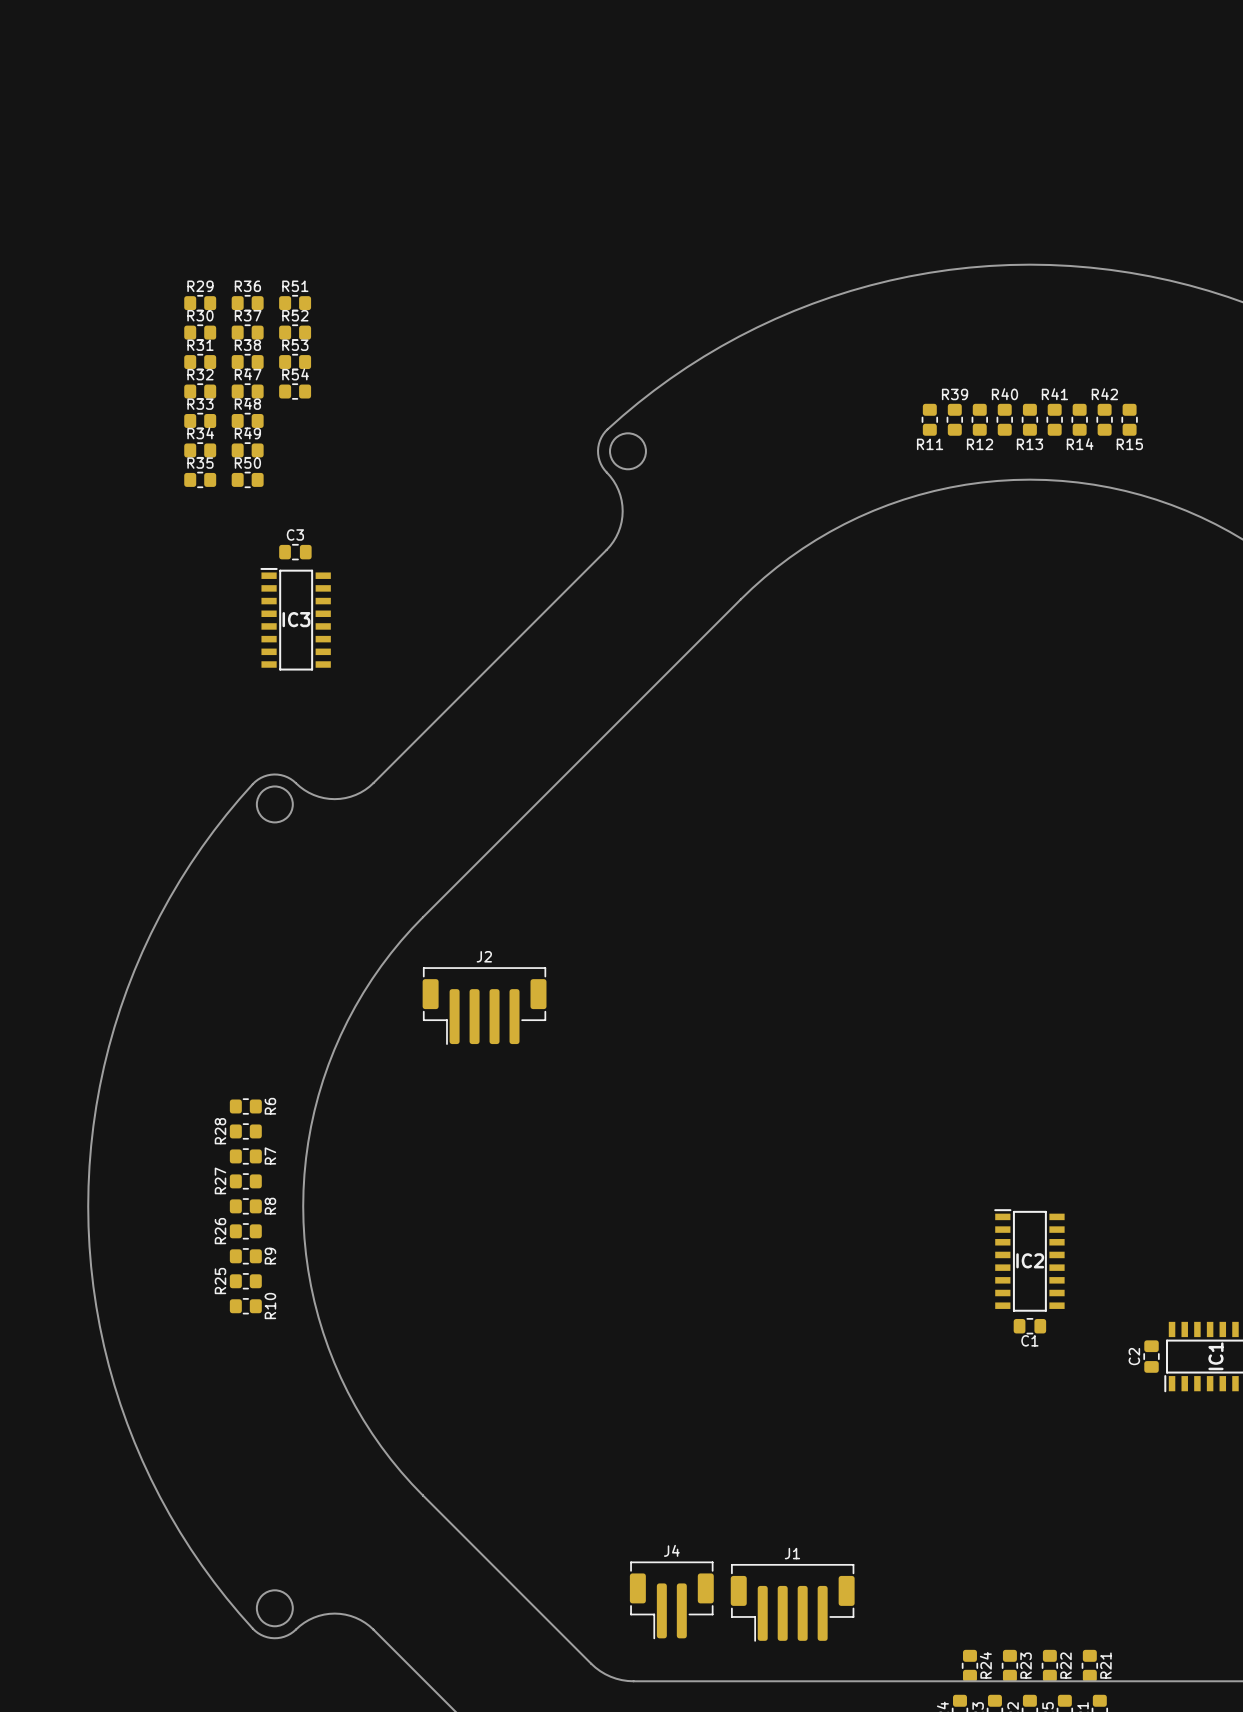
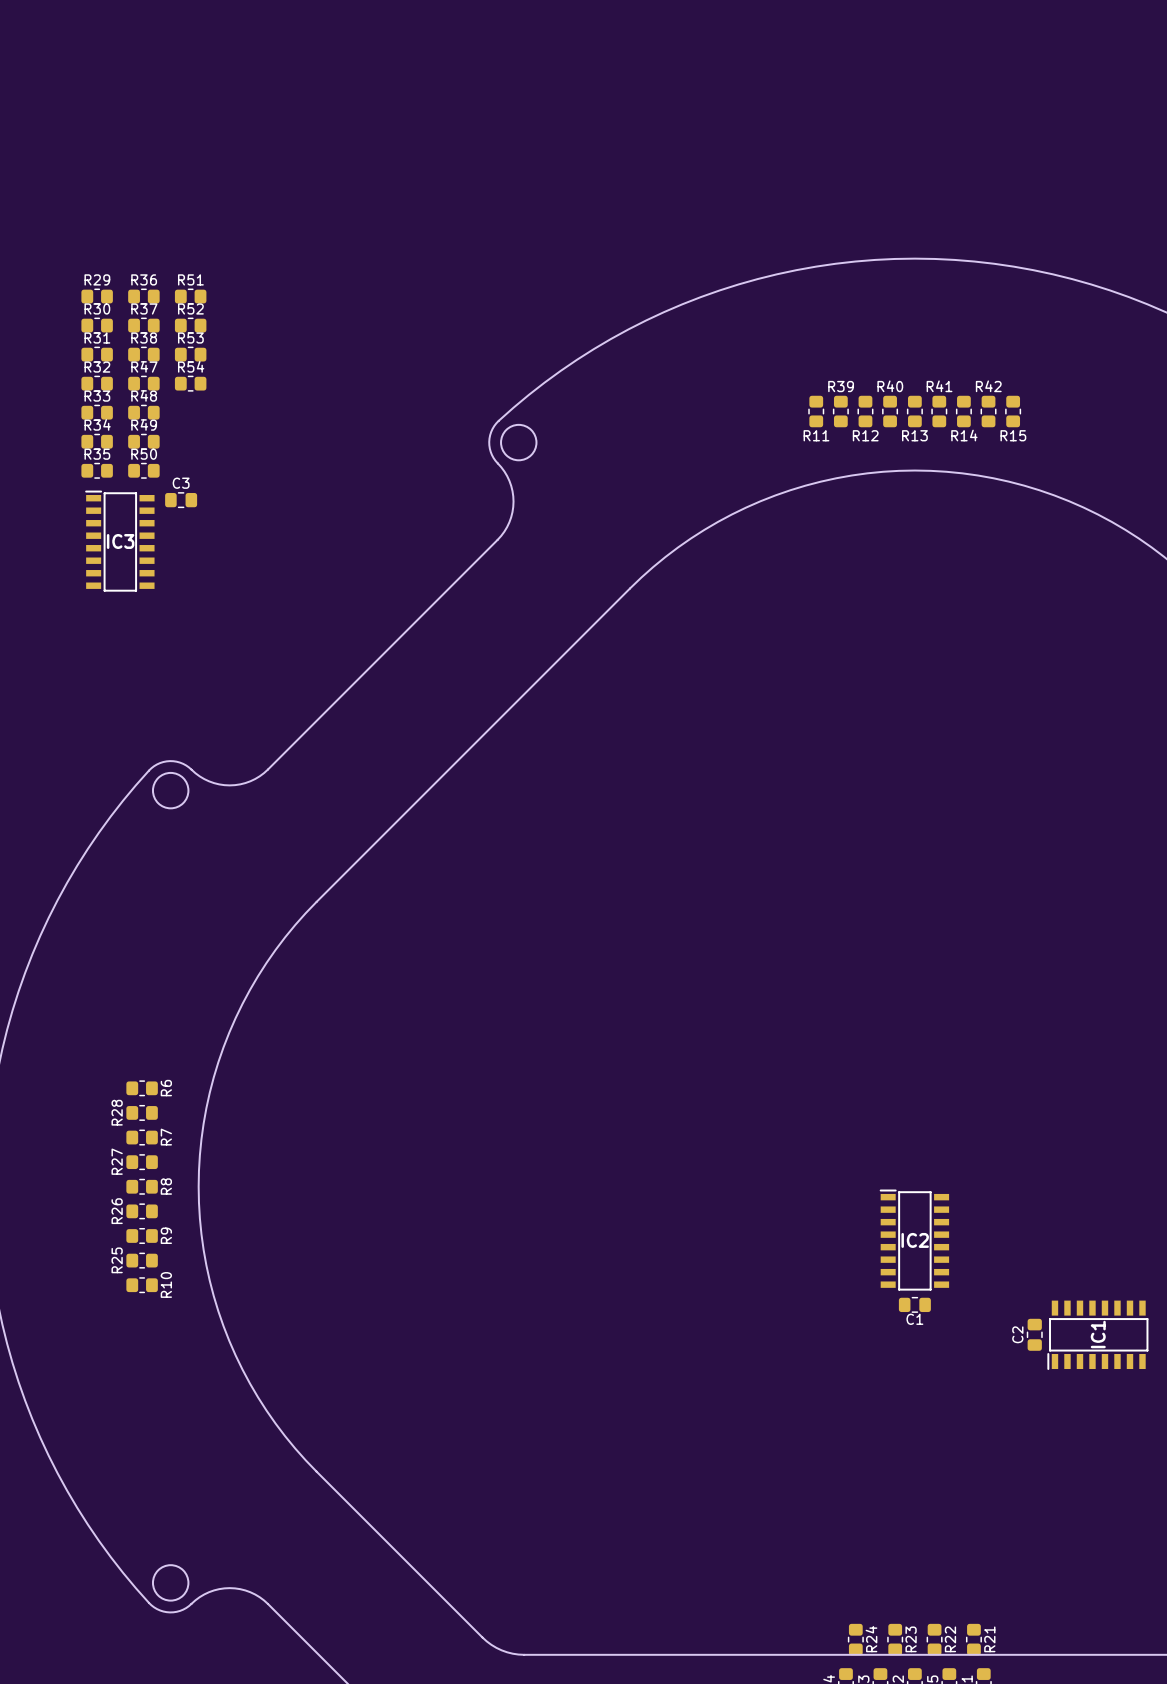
C3 position: (295, 552) -> (181, 500)
IC3 position: (295, 619) -> (119, 541)
J2: (484, 1006) -> none
J4: (671, 1600) -> none
J1: (792, 1602) -> none

